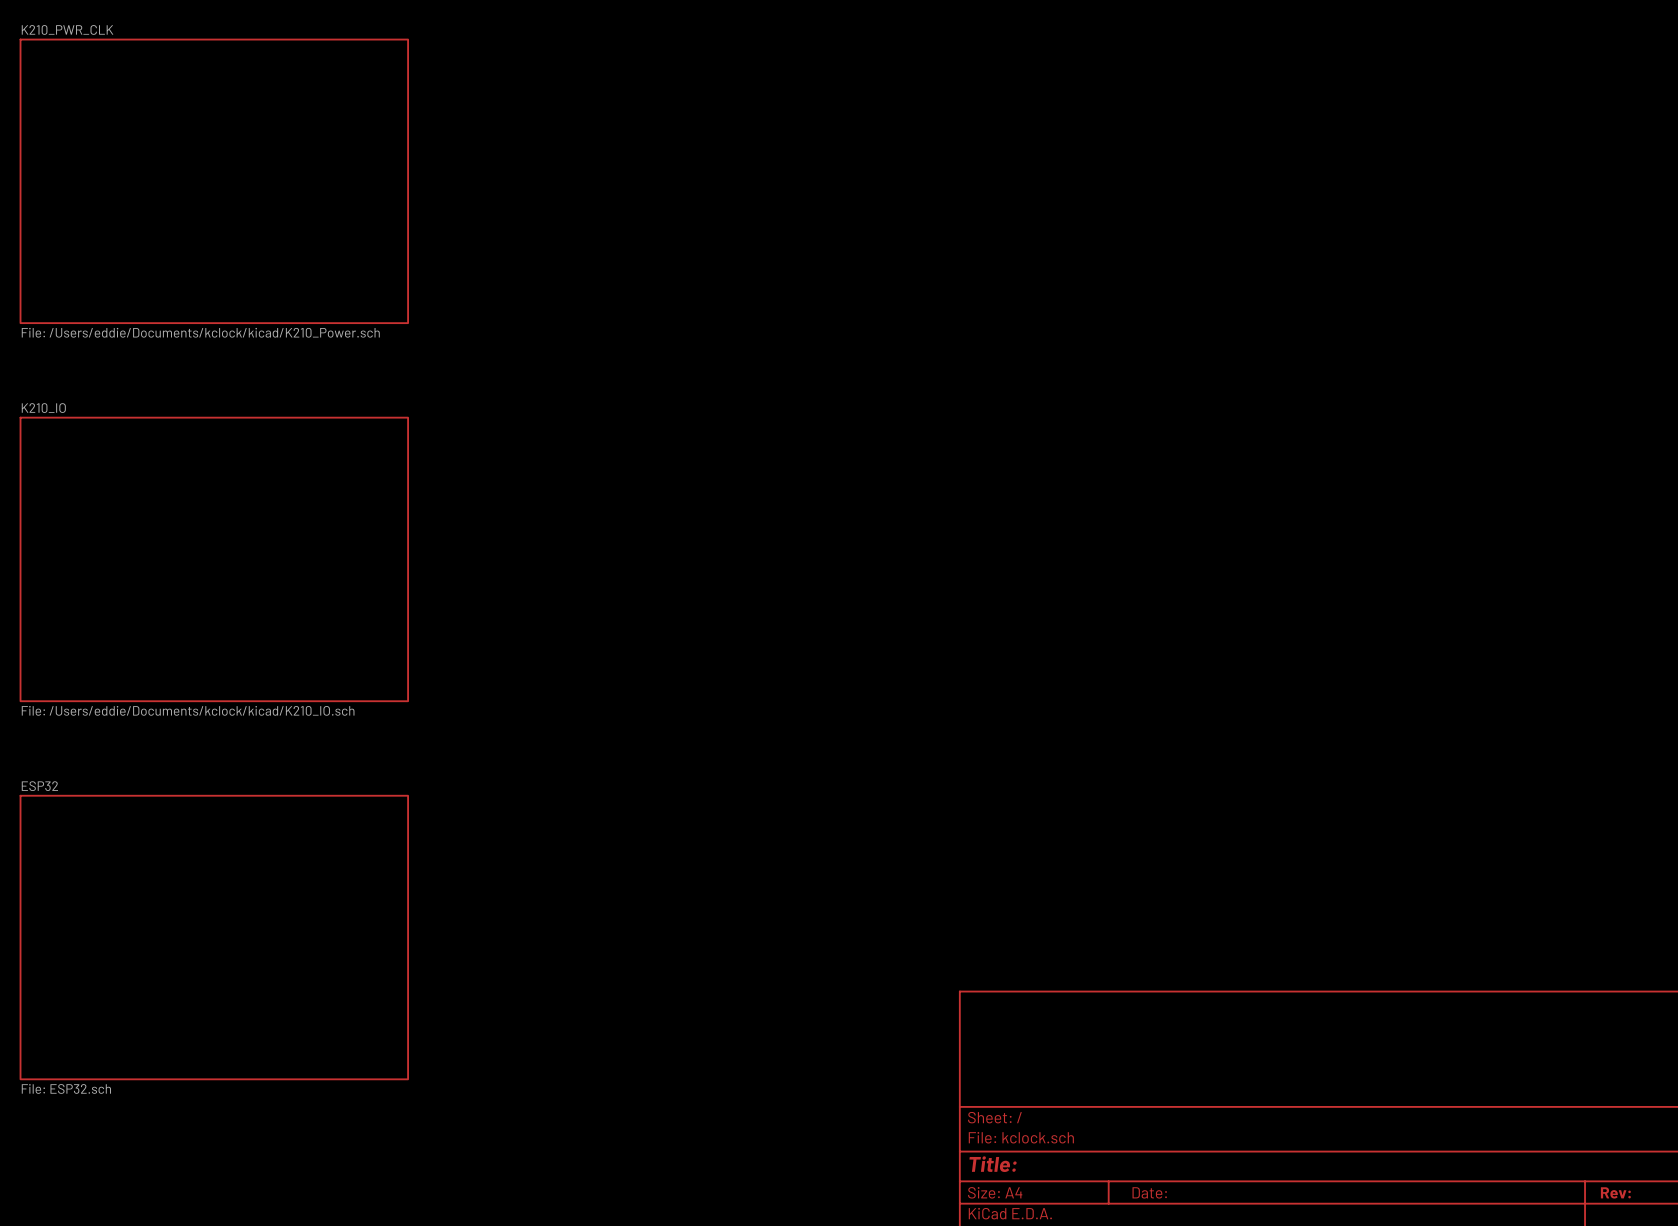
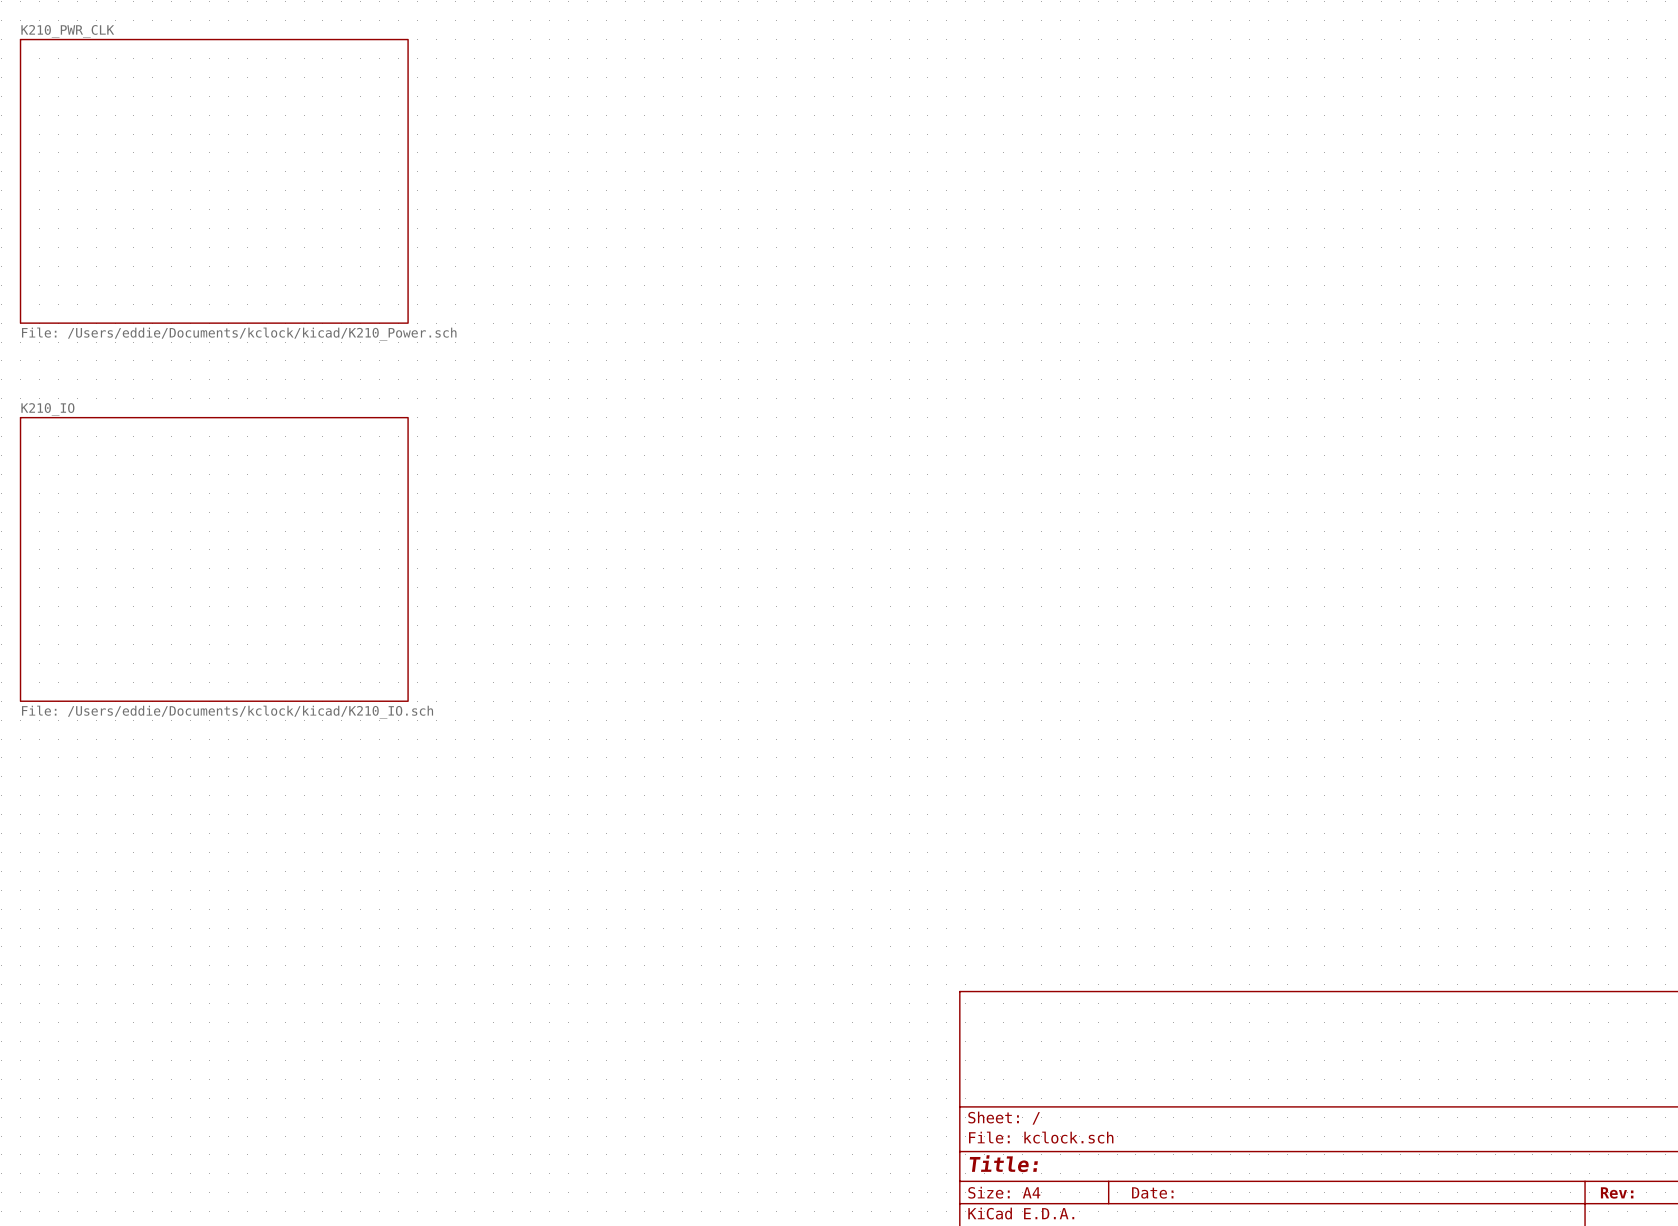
sheet ESP32: File: ESP32.sch (214, 937) -> none

